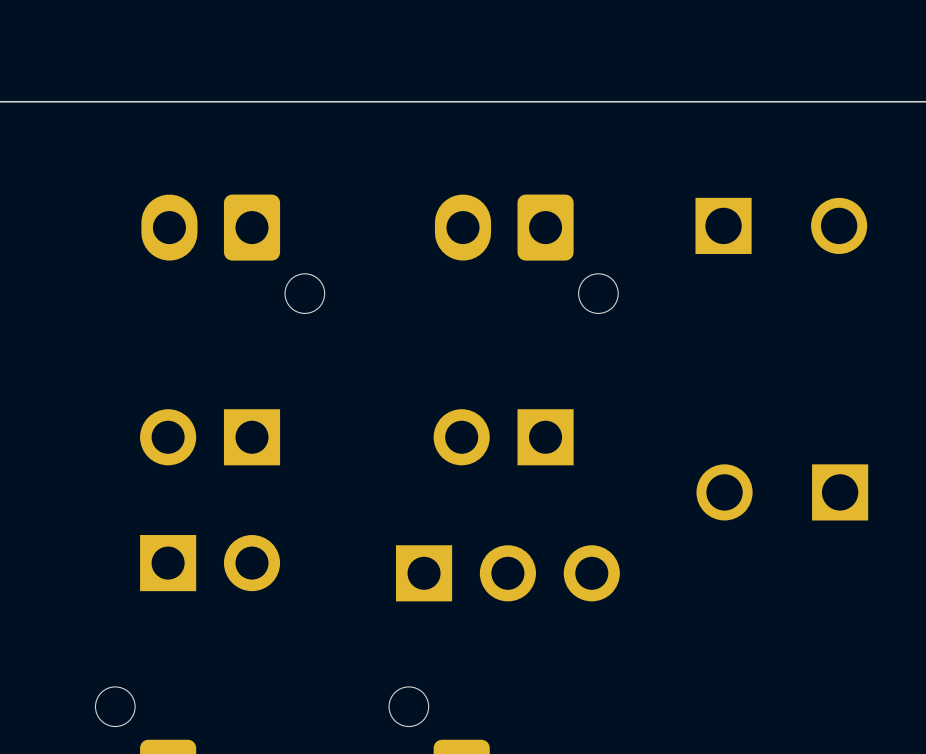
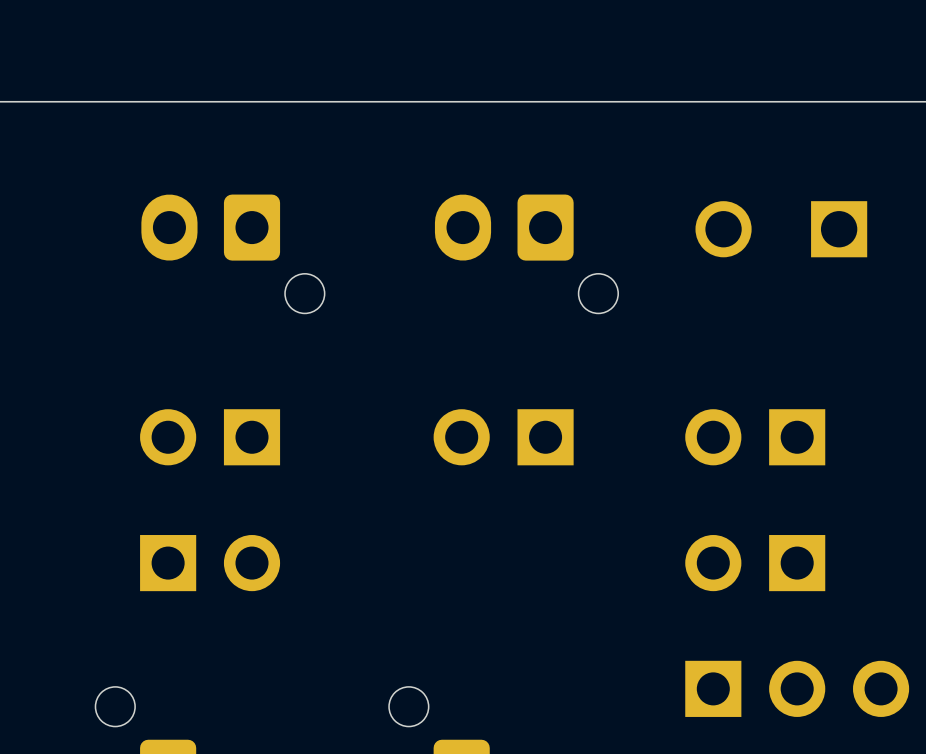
part rotation: 0° (781, 225) -> 180° (781, 229)
part: none -> (755, 437)
part: (782, 492) -> none
part: none -> (755, 563)
part position: (507, 573) -> (797, 688)

